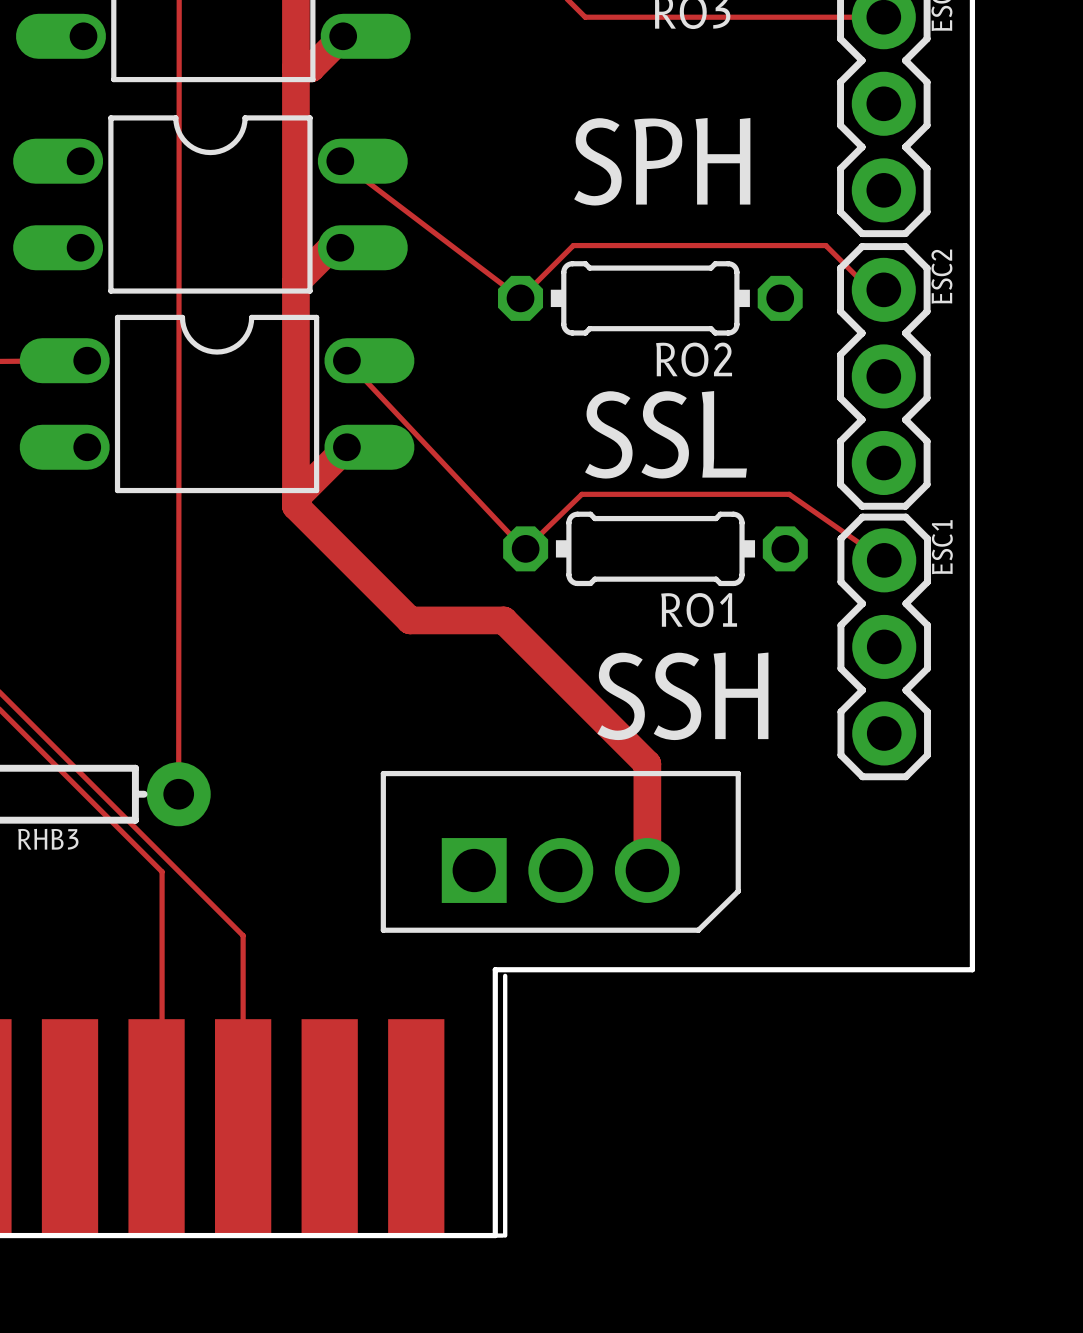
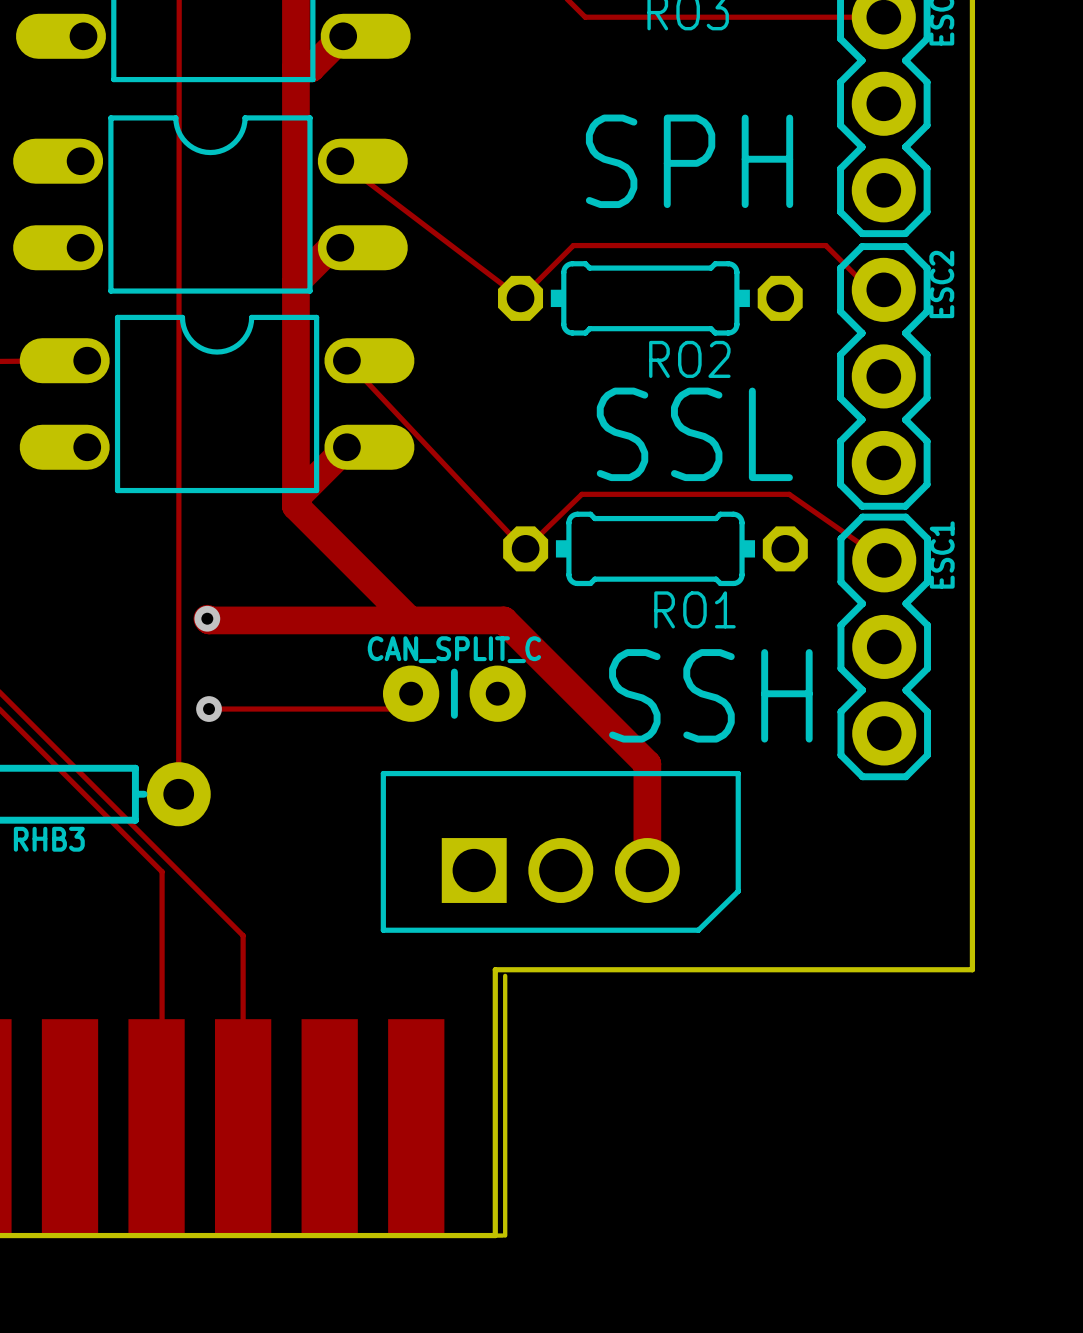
track: none -> (207, 618) (209, 620) (410, 620)
via: none -> (207, 618)
track: none -> (411, 693) (395, 709) (209, 709)
CAN_SPLIT_C: none -> (454, 693)
via: none -> (209, 709)

